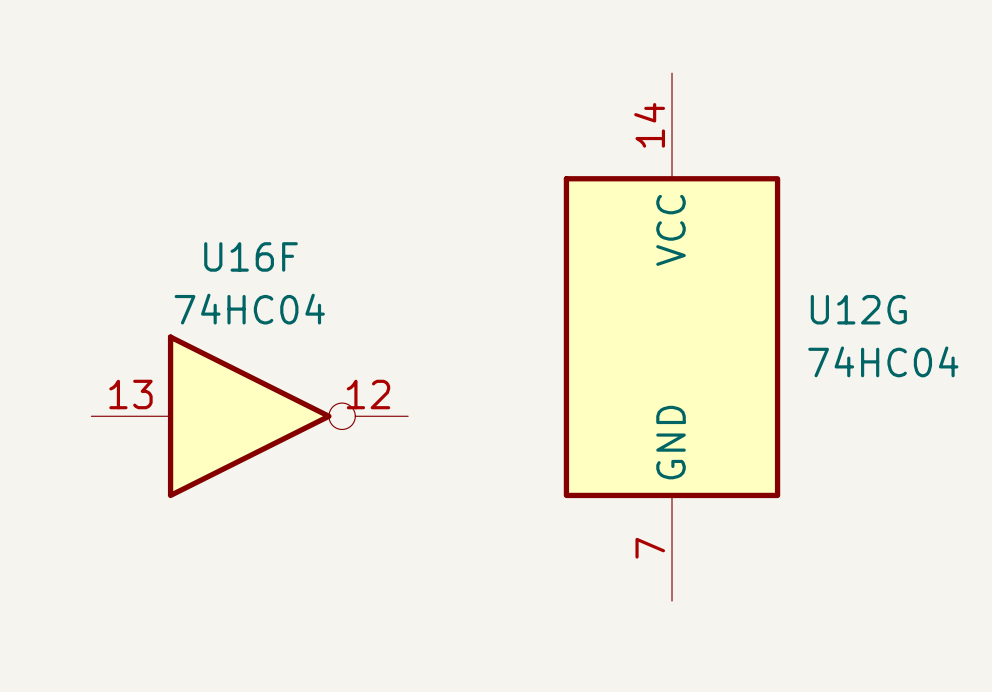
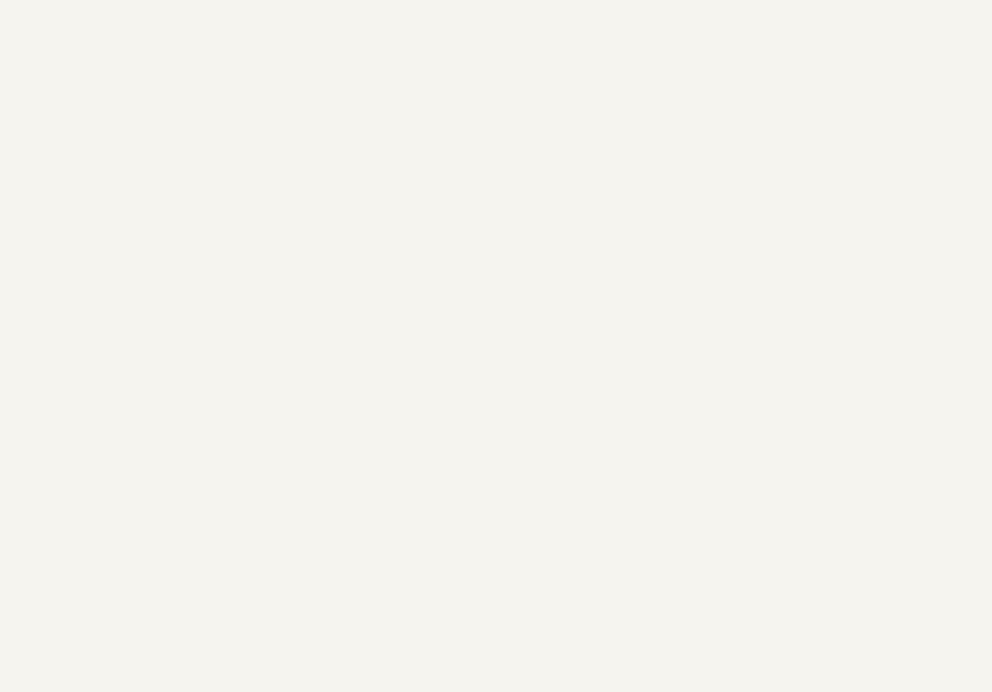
U12G: 74HC04 (672, 337) -> none
U16F: 74HC04 (249, 416) -> none

